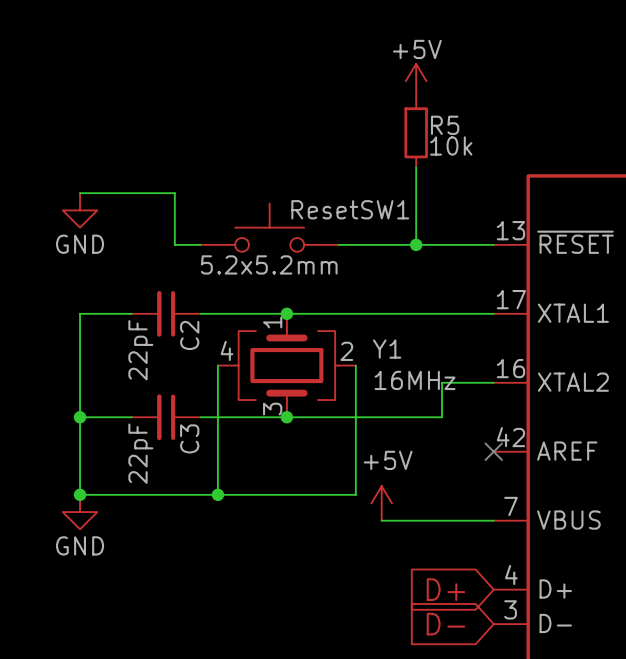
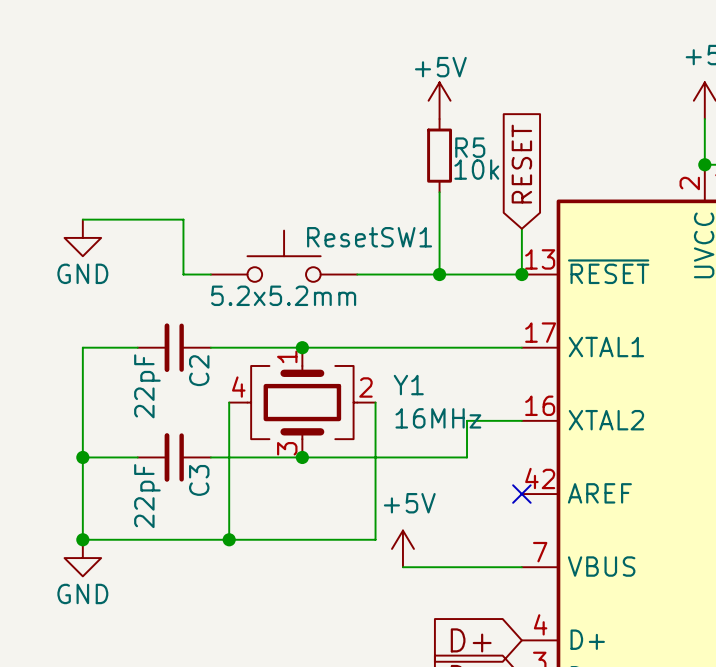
global label: none -> RESET (521, 164)
wire: none -> (521, 228) (521, 274)
junction: none -> (521, 274)

